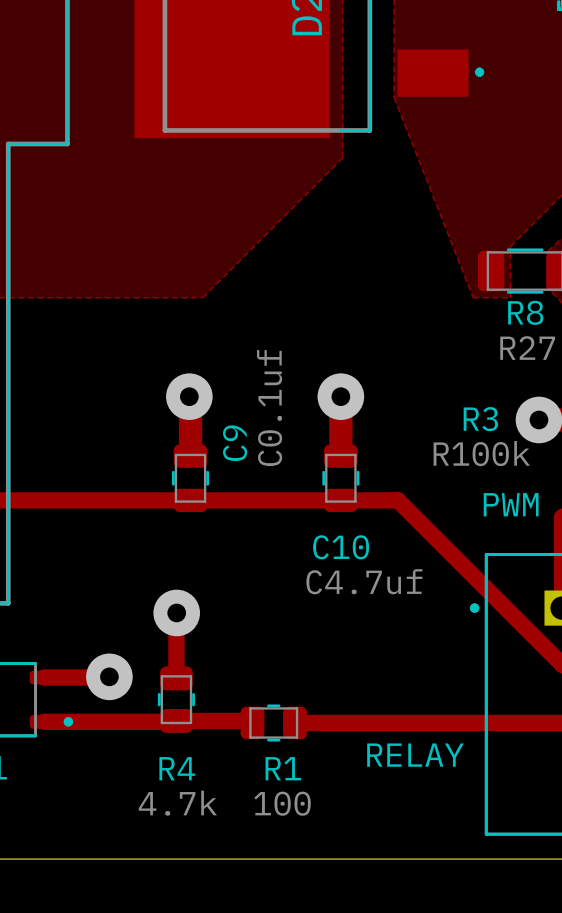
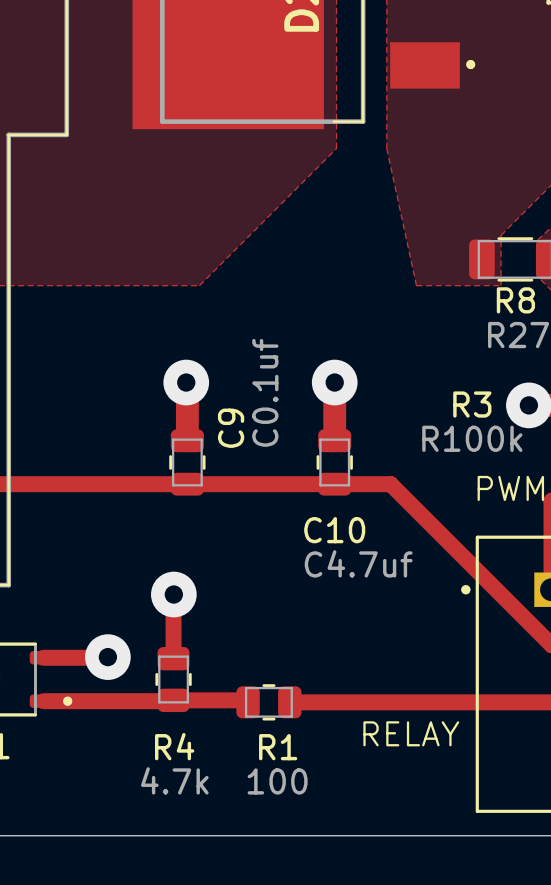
zone outline: (394, 97) (473, 297) -> (386, 89) (386, 148) (416, 285) (464, 285)

